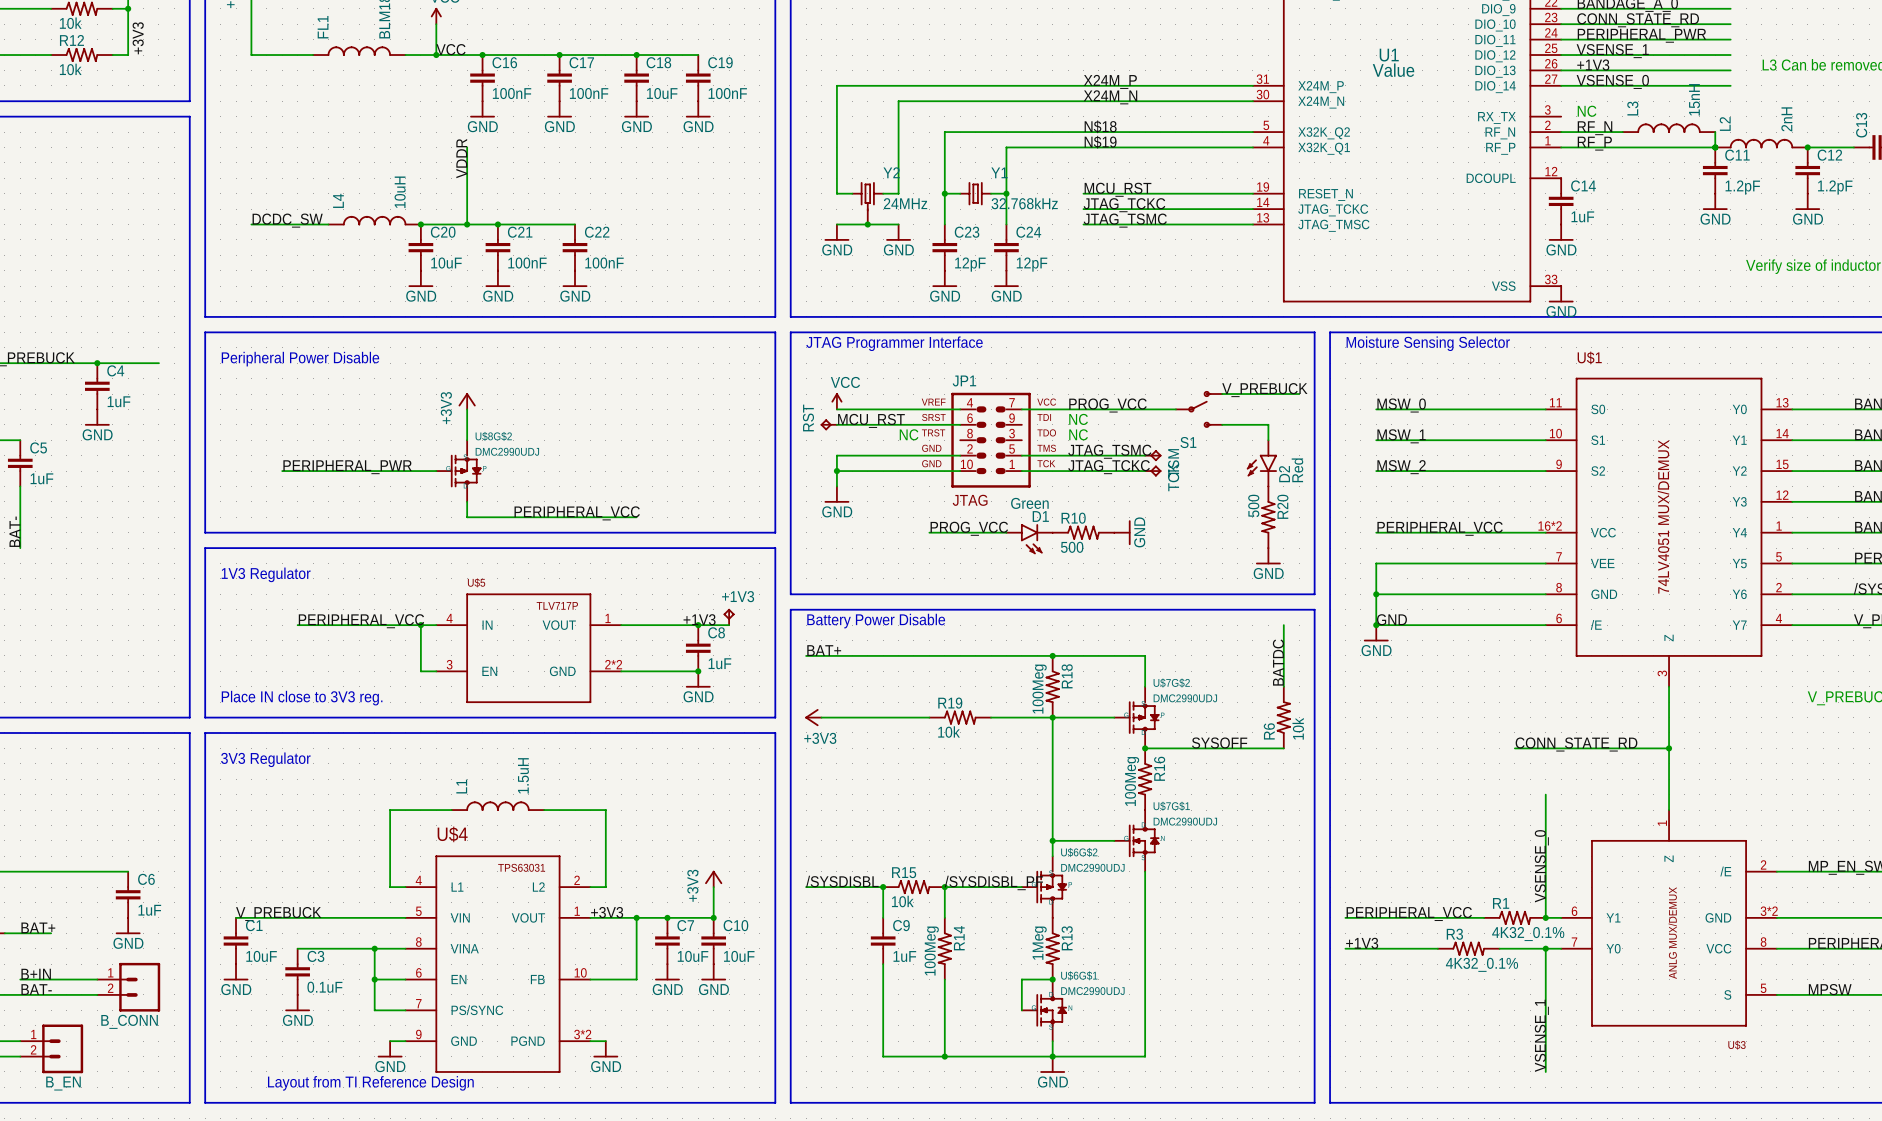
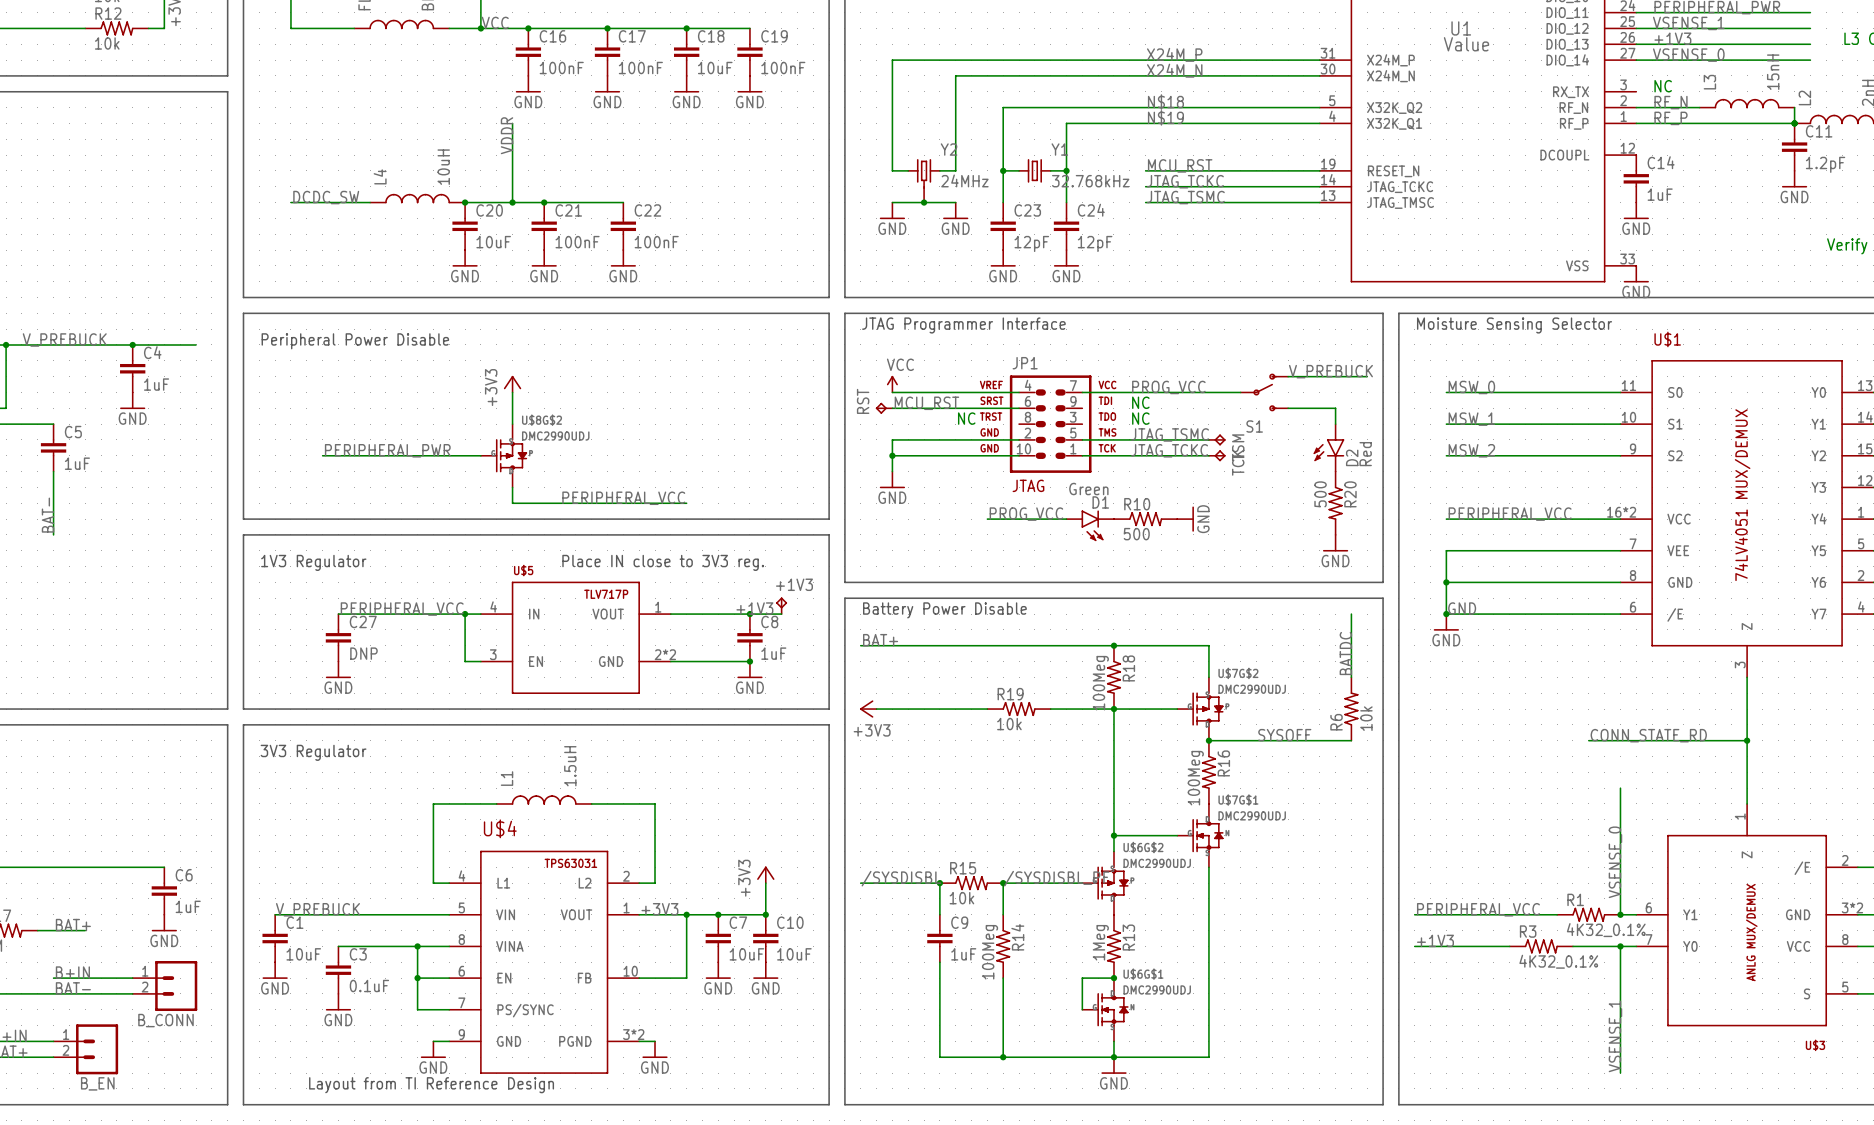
text: none -> Place IN close to 3V3 reg. (663, 562)
C27: none -> DNP (338, 637)
power symbol: none -> GND (338, 669)
text: Place IN close to 3V3 reg. (302, 698) -> none

